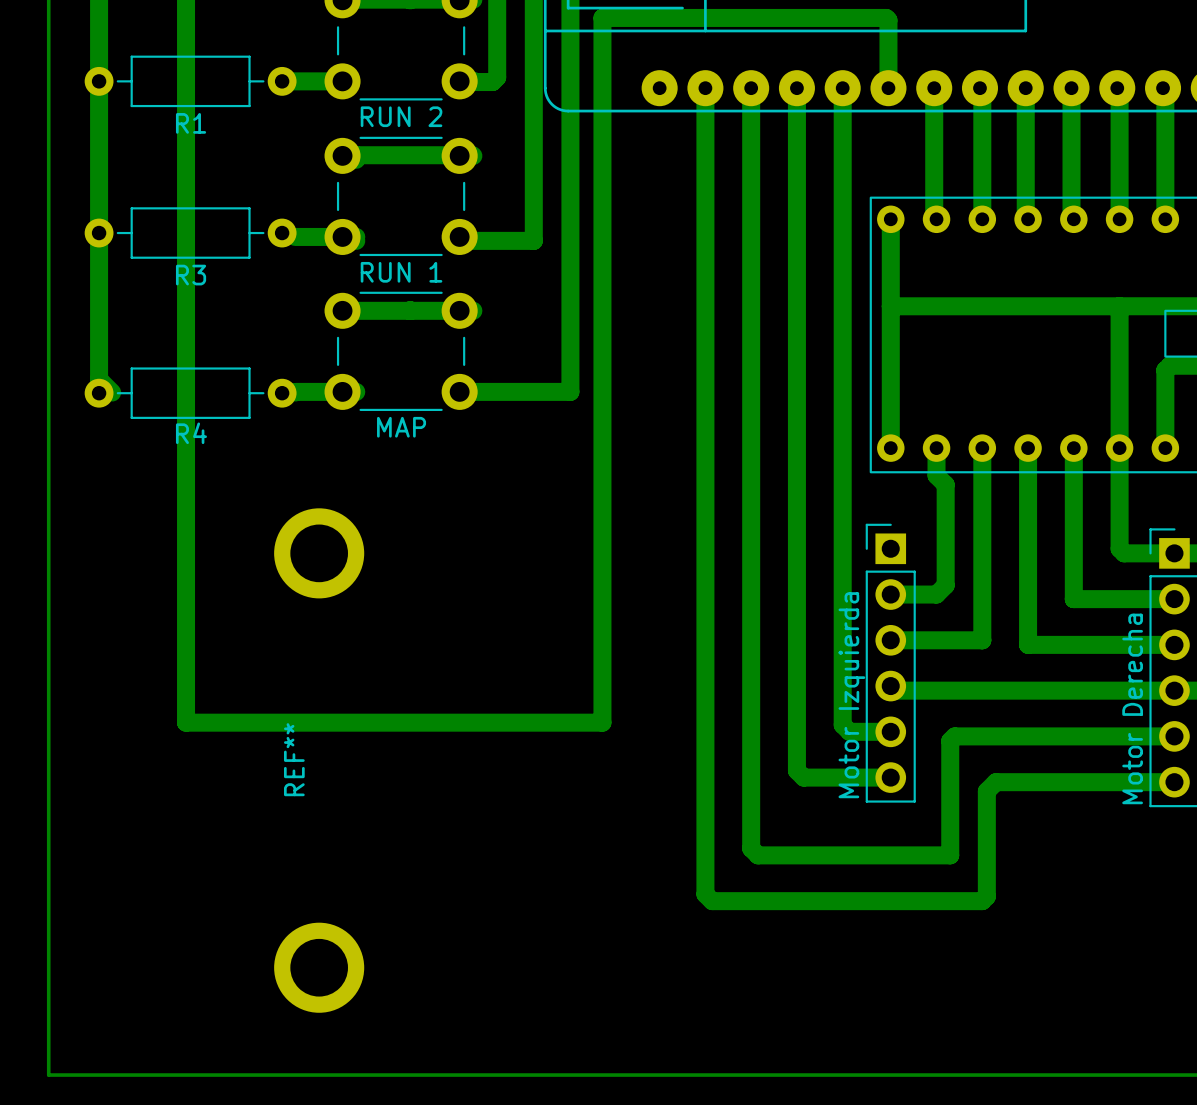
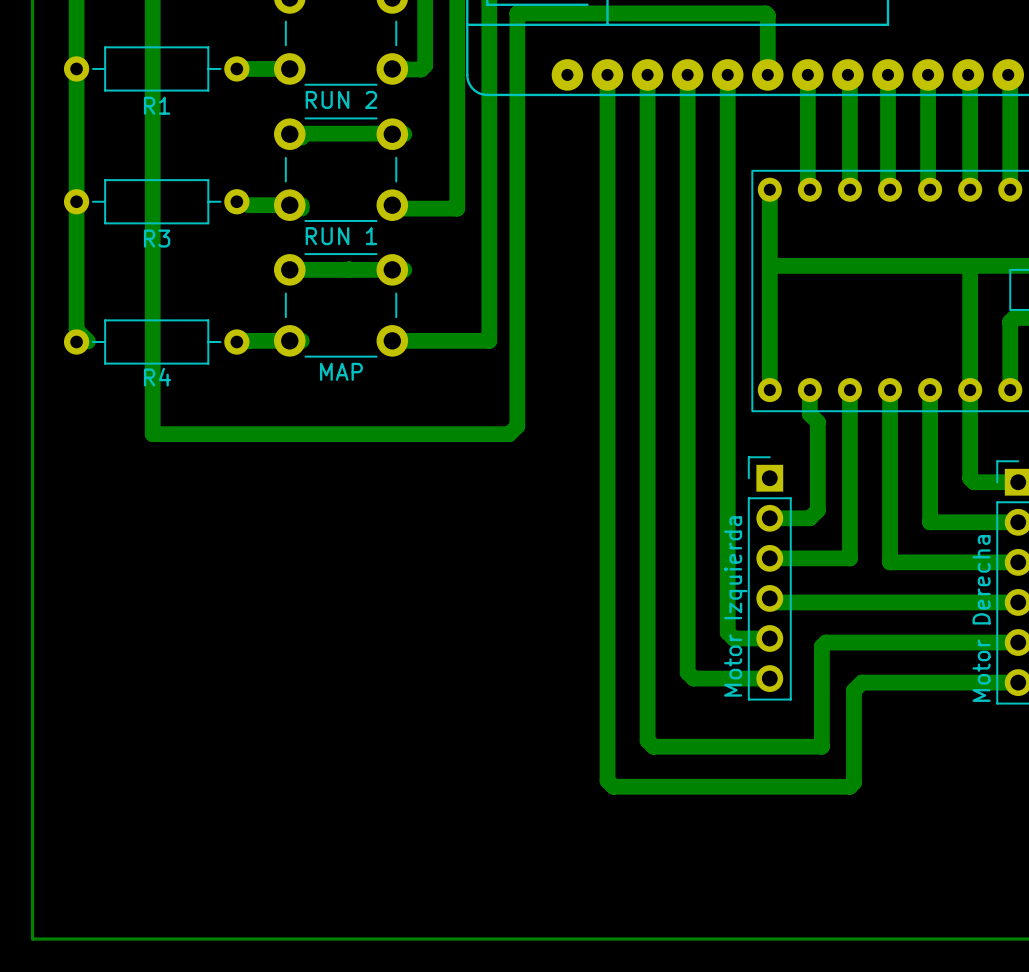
bottom track: (602, 489) (602, 722) (186, 722) (186, 498) -> (517, 426) (509, 434) (152, 434)
REF**: (319, 760) -> none

